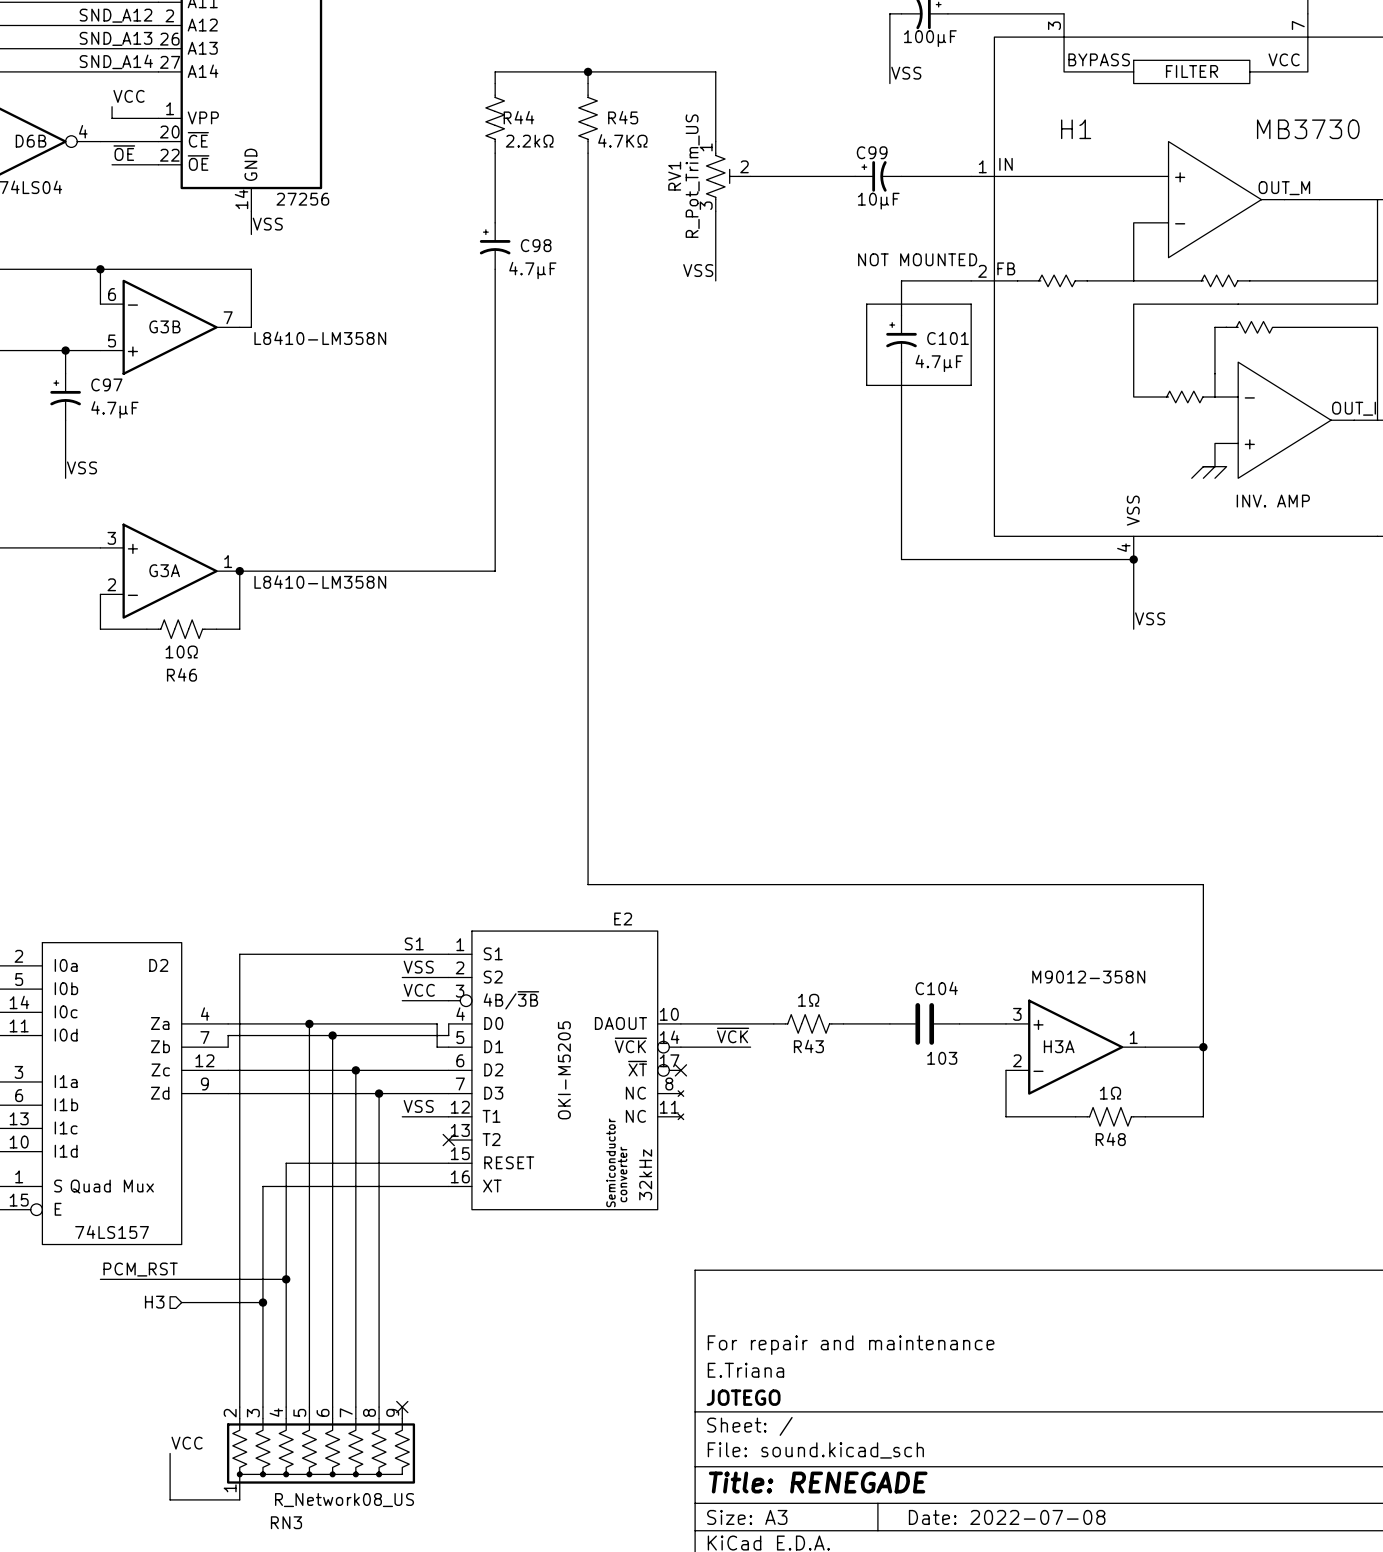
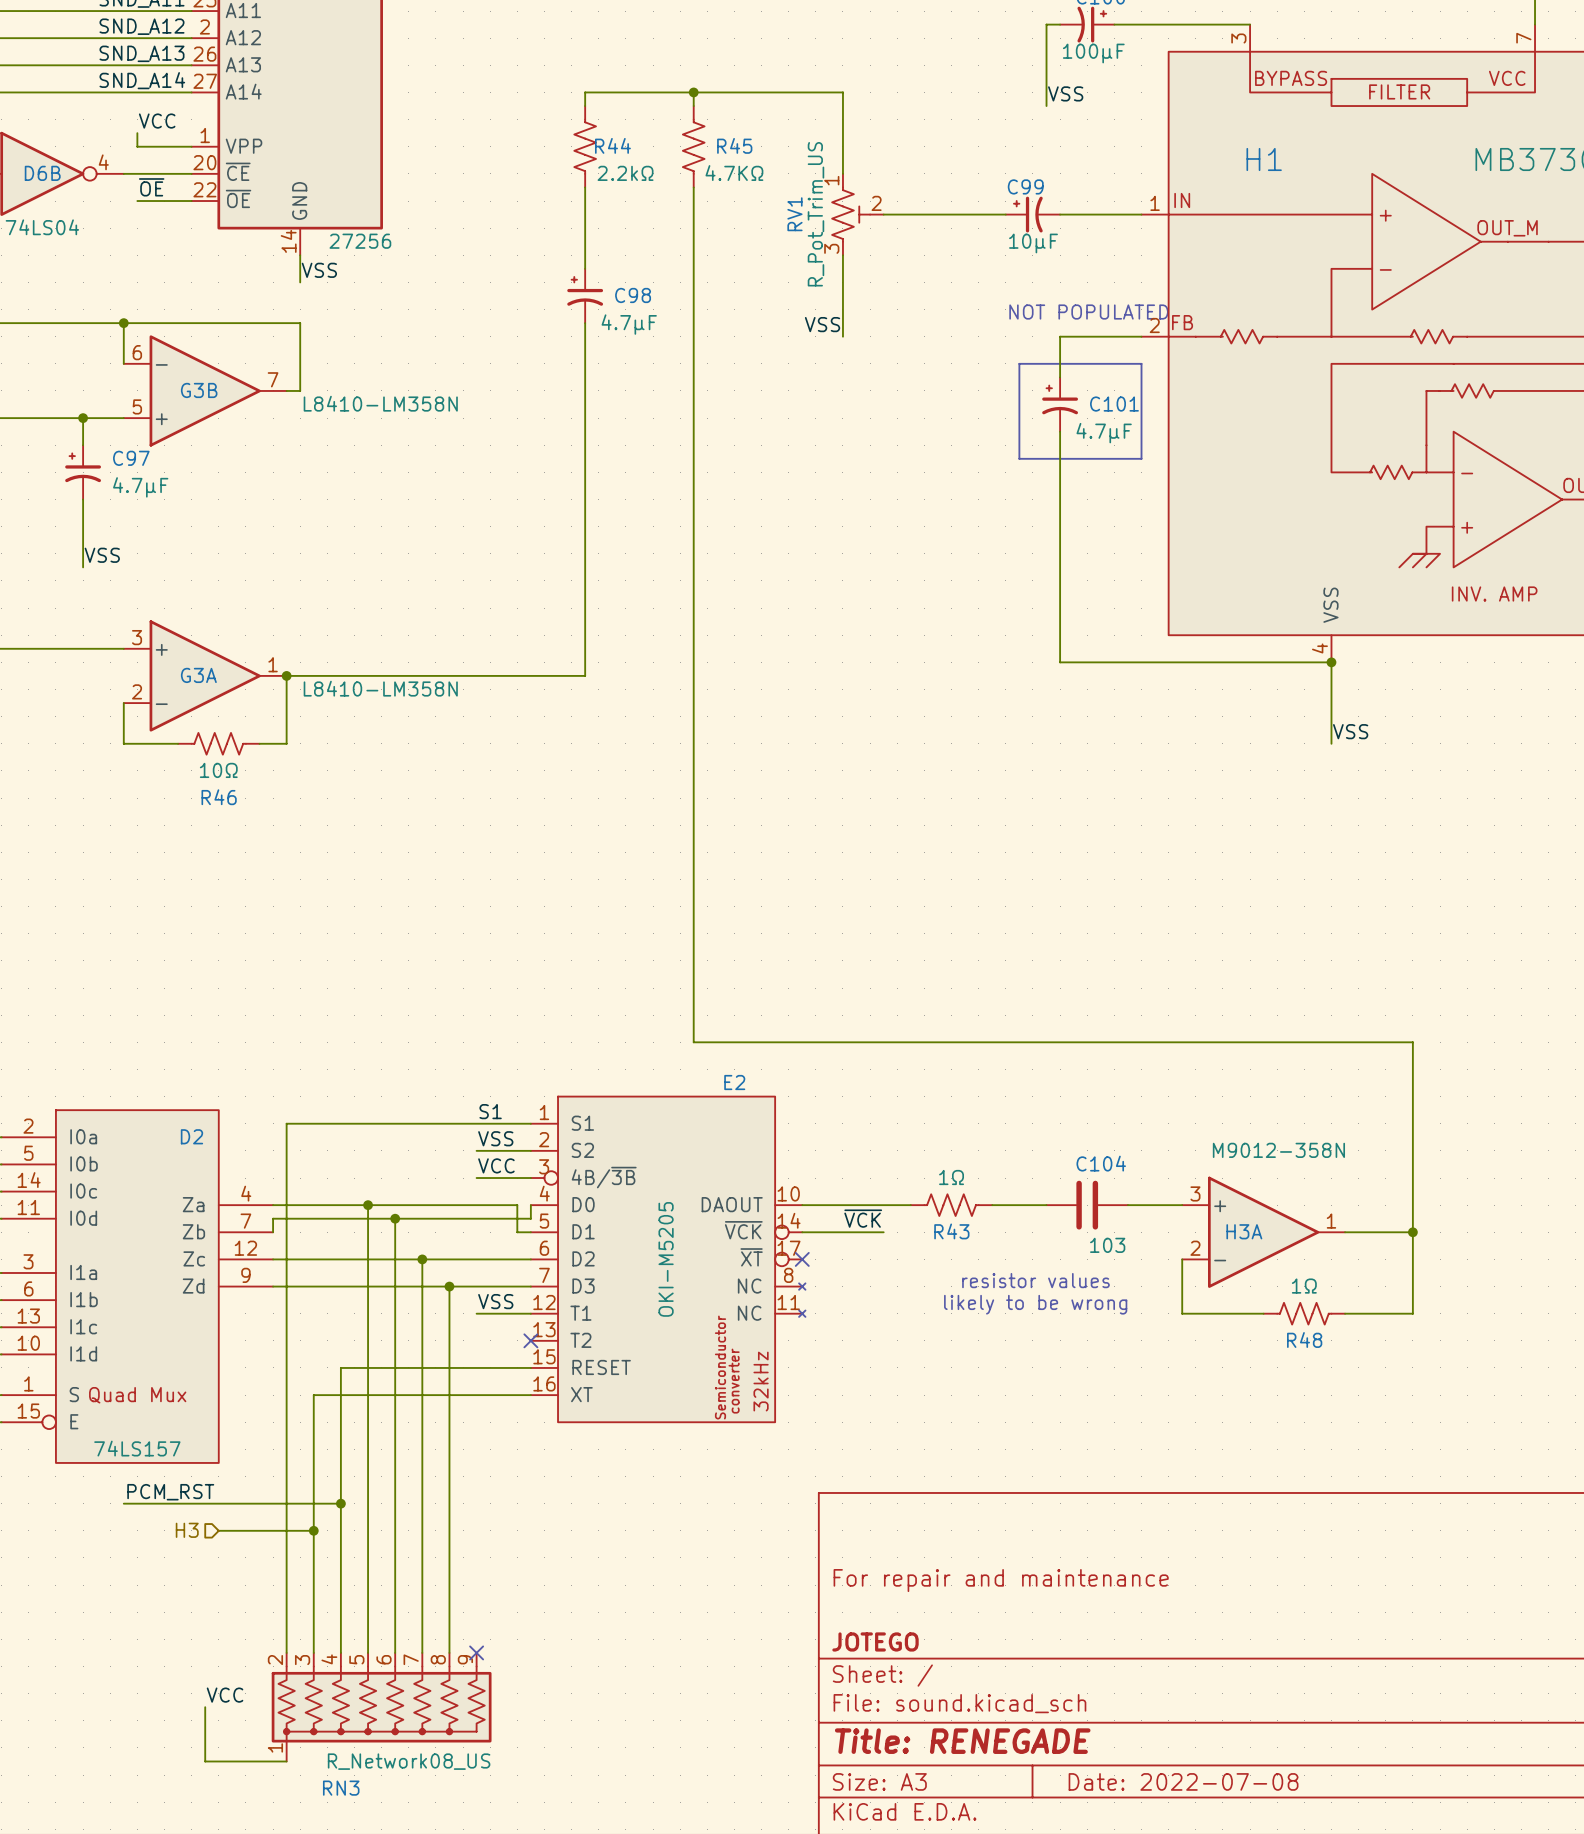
text: NOT MOUNTED (917, 259) -> NOT POPULATED (1088, 312)
text: none -> resistor values (1035, 1280)
text: none -> likely to be wrong (1035, 1304)
title block: E.Triana (745, 1370) -> none

